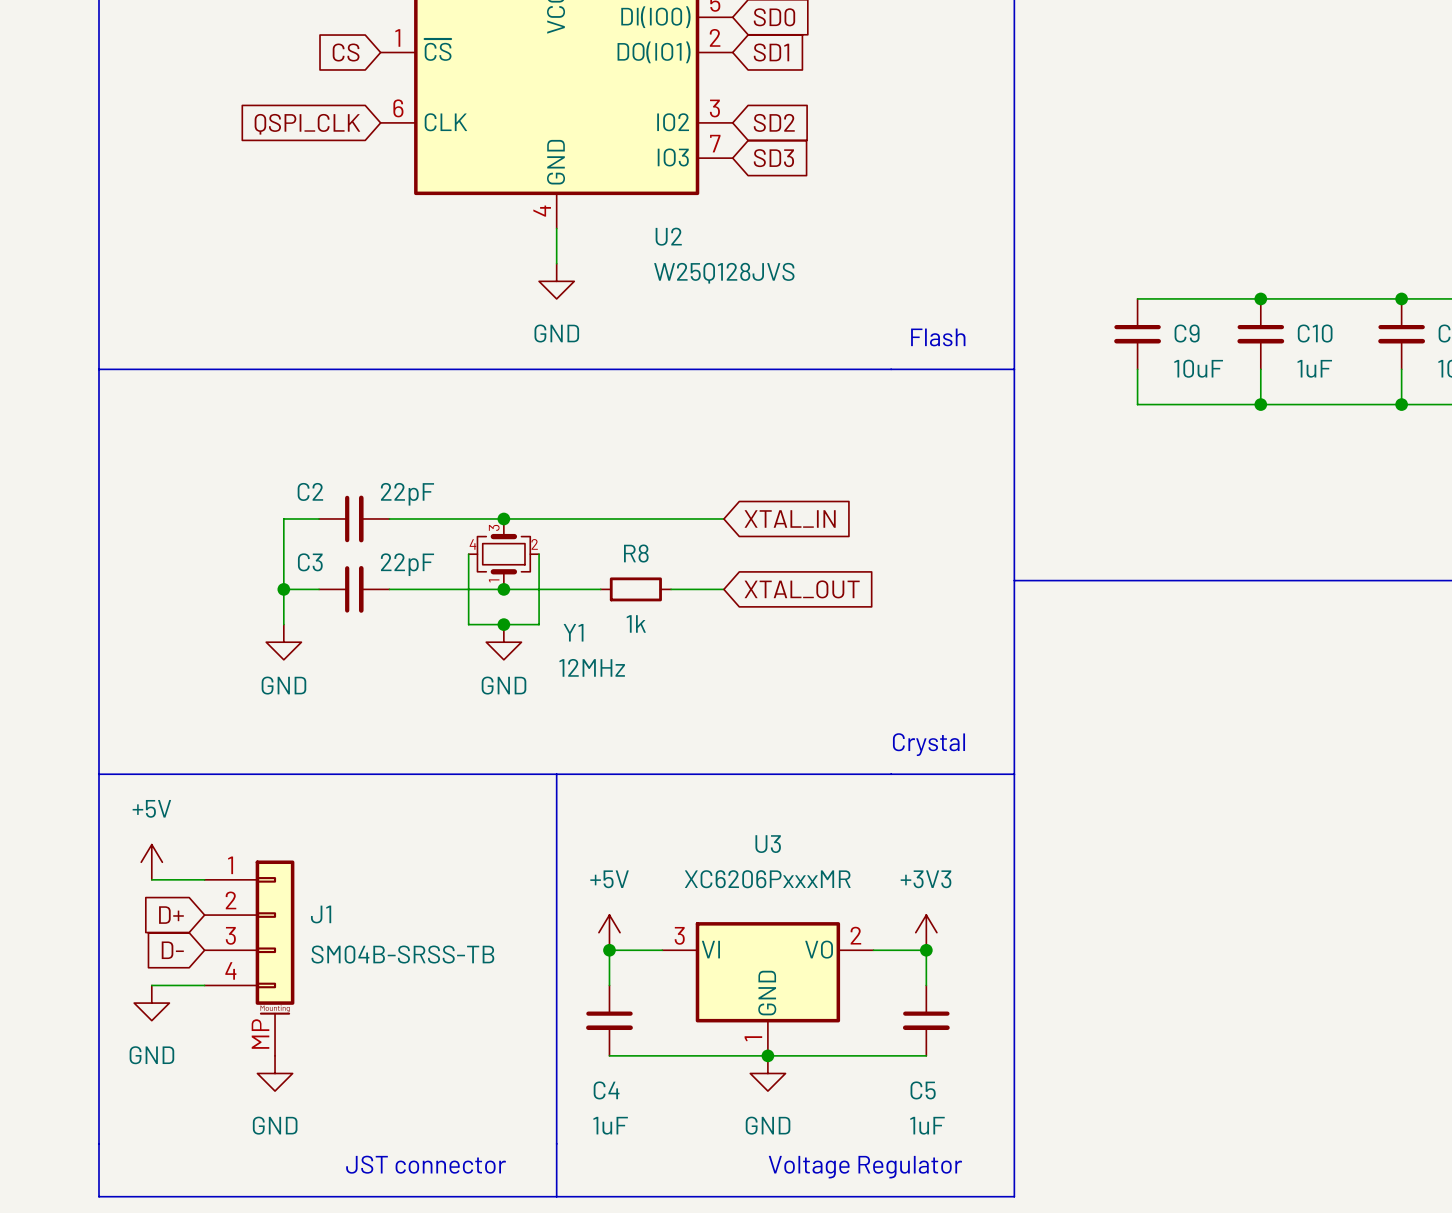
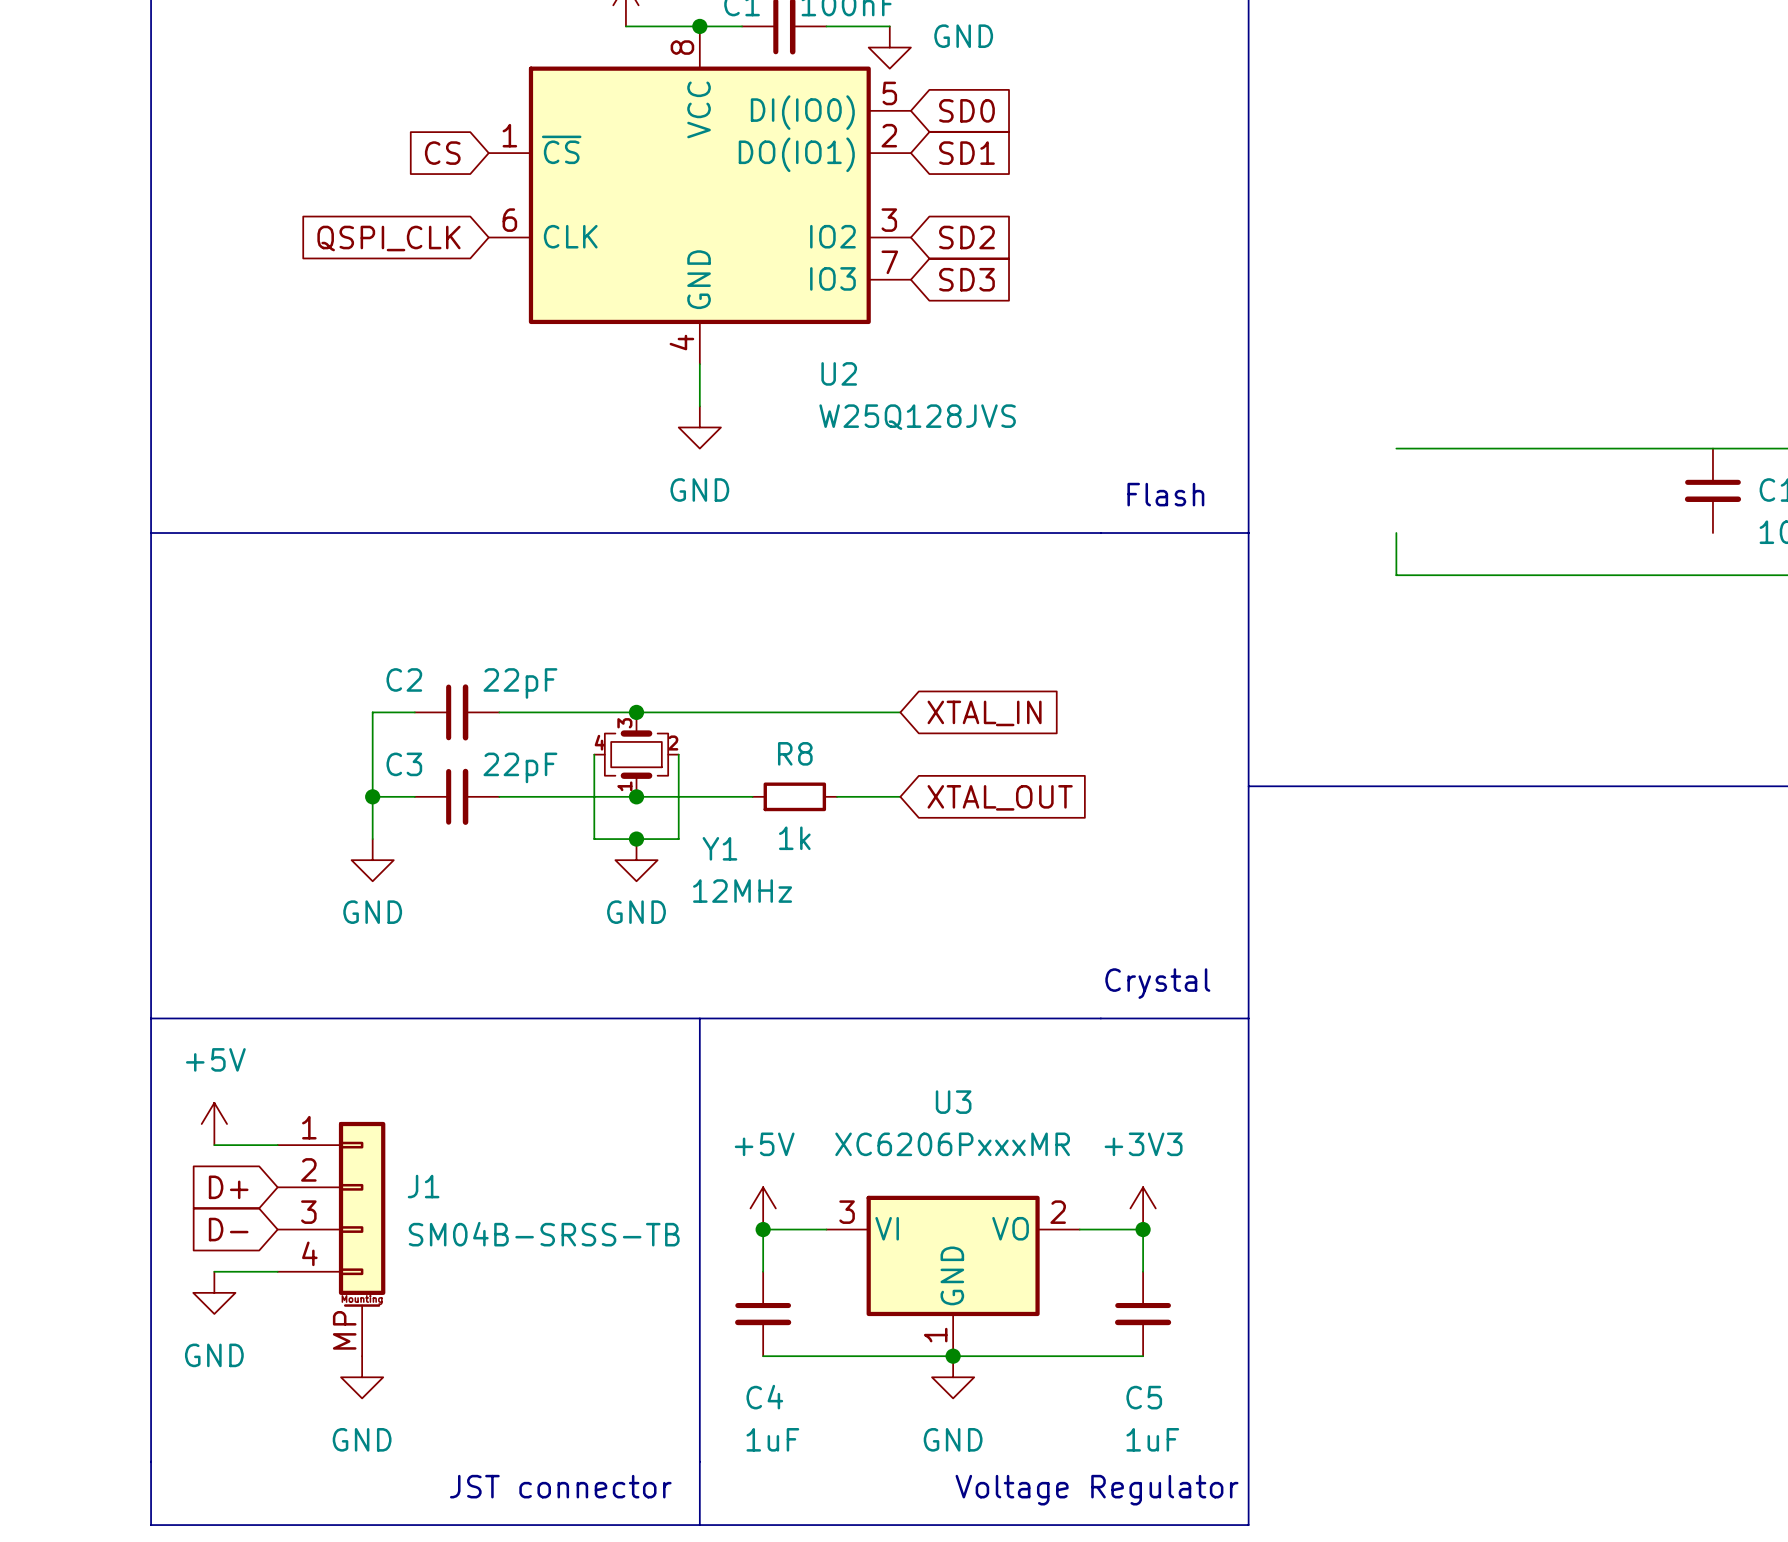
junction: (1260, 298) -> none
junction: (1401, 298) -> none
C9: 10uF (1137, 334) -> none
C10: 1uF (1260, 334) -> none
wire: (1260, 369) (1260, 404) -> none
wire: (1401, 369) (1401, 404) -> none
junction: (1260, 404) -> none
junction: (1401, 404) -> none

